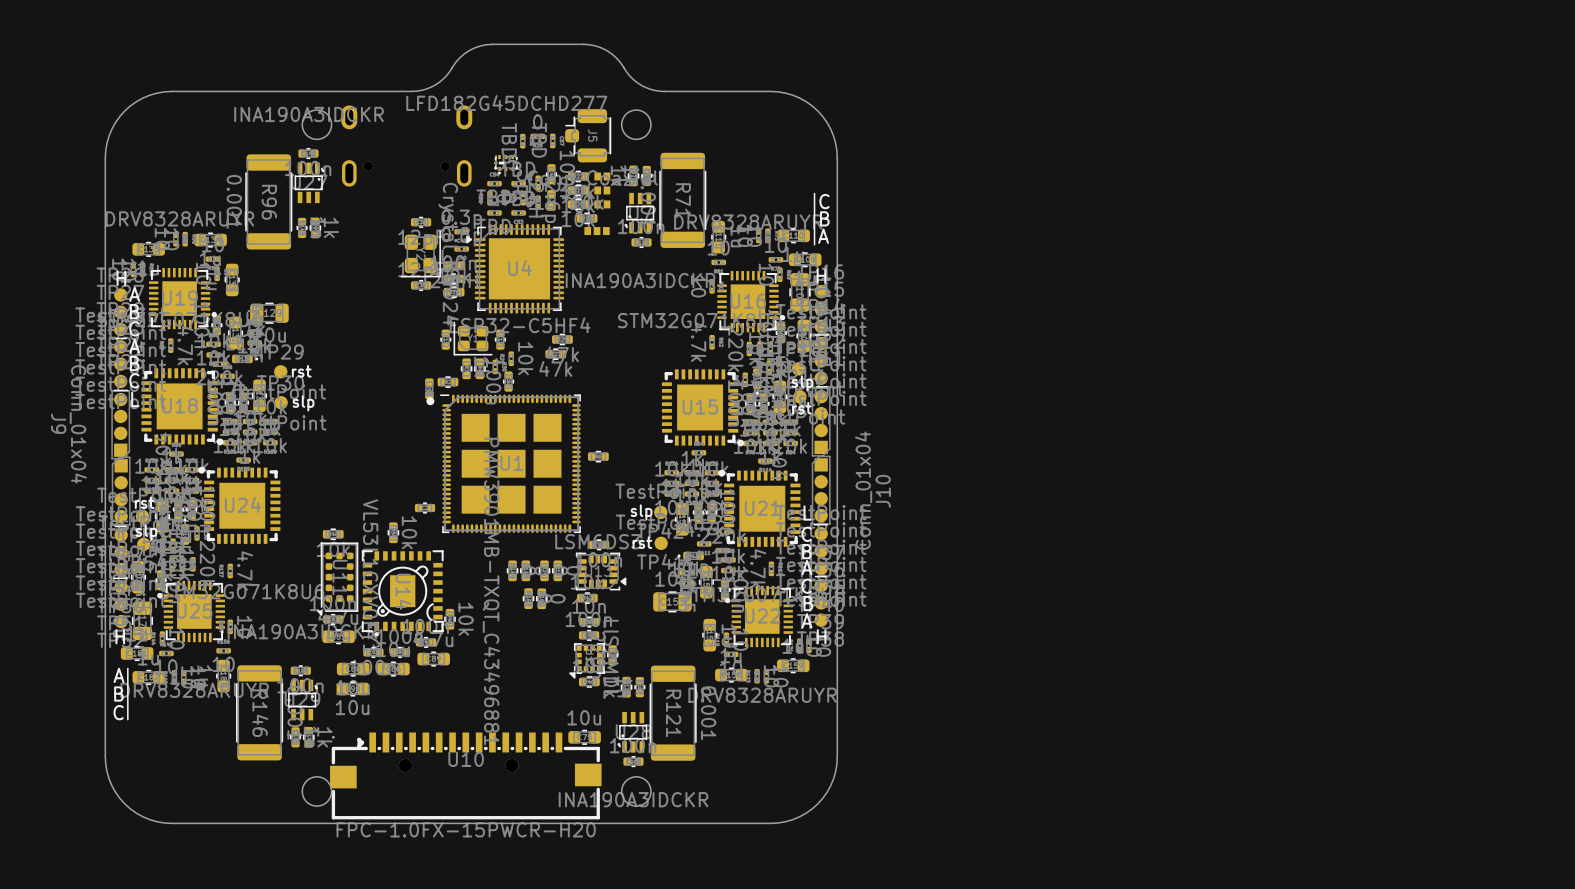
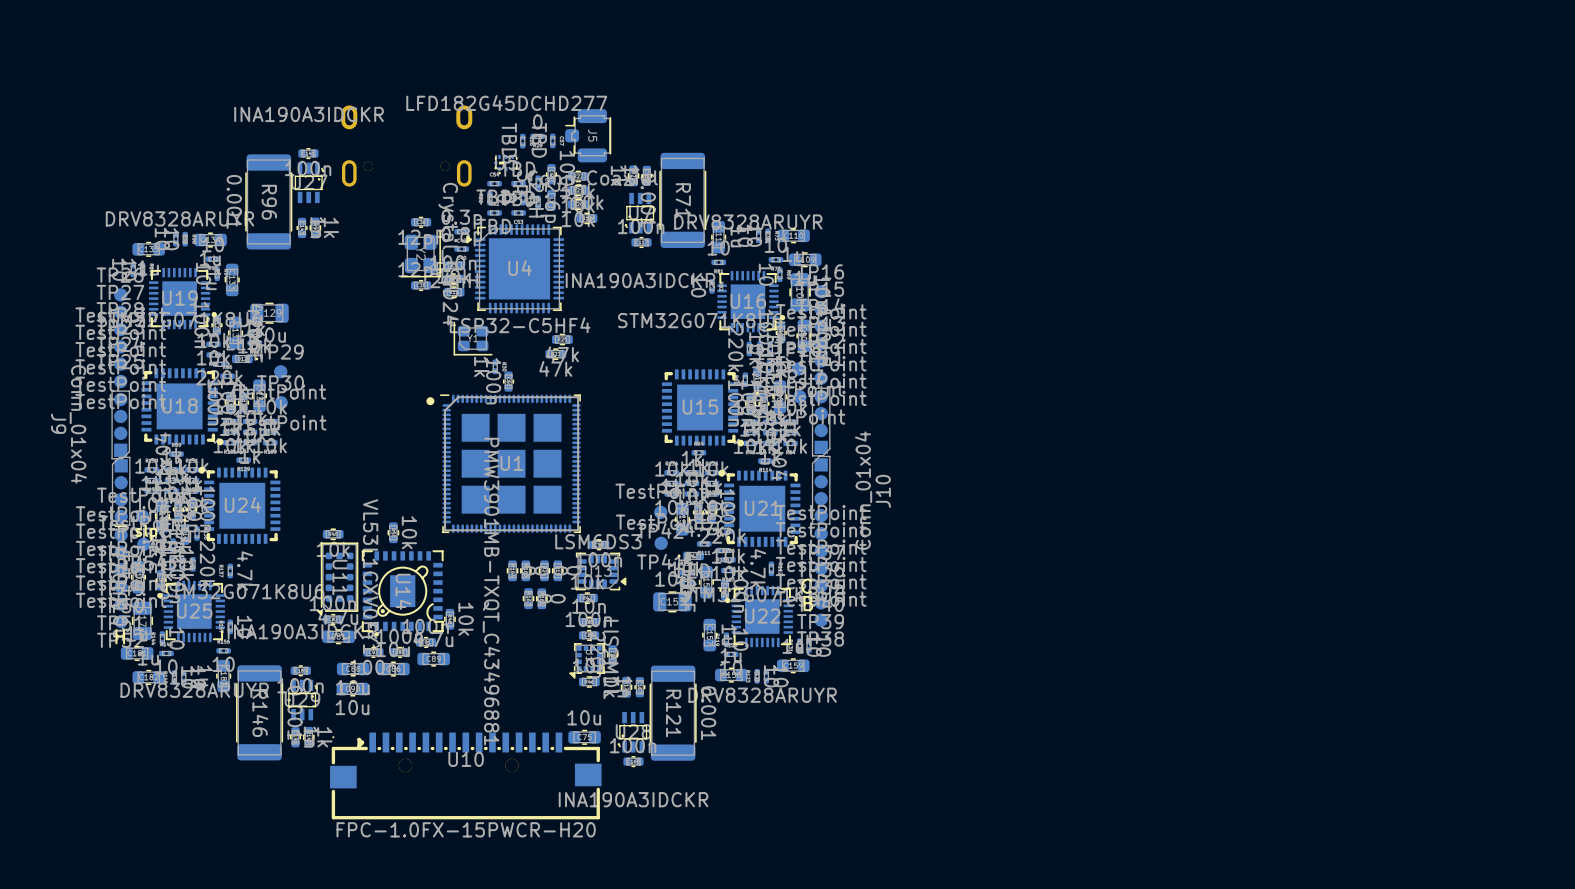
board edge: (583, 44) (480, 45) (469, 50) (459, 57) (439, 82) (430, 87) (416, 91) (164, 91) (149, 95) (136, 101) (124, 110) (115, 122) (107, 143) (105, 157) (105, 756) (107, 771) (111, 785) (119, 798) (136, 813) (157, 821) (171, 823) (770, 823) (785, 821) (806, 813) (817, 803) (827, 792) (835, 771) (837, 756) (837, 157) (833, 136) (827, 122) (817, 110) (806, 101) (792, 95) (770, 91) (654, 90) (645, 87) (632, 79) (616, 57) (606, 50) (595, 45) (583, 44) -> none
round board edge: [301, 109, 332, 140] -> none
round board edge: [621, 109, 652, 140] -> none
part: (602, 176) -> none
part: (602, 190) -> none
line: (814, 193) (814, 244) -> none
text: C (824, 201) -> none
part: (602, 204) -> none
text: B (824, 218) -> none
part: (597, 231) -> none
text: A (823, 236) -> none
text: H (821, 276) -> none
text: H (121, 278) -> none
text: A (134, 294) -> none
text: B (134, 311) -> none
text: C (134, 328) -> none
line: (828, 334) (815, 334) -> none
line: (126, 338) (115, 338) -> none
part: (445, 339) -> none
part: (500, 339) -> none
part: 4.7k (712, 342) -> none
part: 4.7k (170, 345) -> none
text: A (134, 346) -> none
part: 10k (511, 358) -> none
text: B (134, 363) -> none
part: (466, 368) -> none
part: (479, 368) -> none
text: rst (301, 371) -> none
text: C (134, 380) -> none
part: (447, 382) -> none
text: slp (802, 383) -> none
line: (827, 386) (816, 386) -> none
line: (127, 390) (114, 390) -> none
part: (429, 391) -> none
text: L (135, 399) -> none
text: slp (303, 403) -> none
text: rst (801, 408) -> none
part: (598, 456) -> none
text: rst (144, 502) -> none
part: (425, 508) -> none
text: slp (641, 512) -> none
text: L (807, 513) -> none
line: (827, 524) (814, 524) -> none
text: C (806, 534) -> none
text: rst (642, 542) -> none
text: B (806, 551) -> none
text: A (807, 567) -> none
line: (826, 576) (815, 576) -> none
line: (127, 578) (113, 578) -> none
text: A (807, 620) -> none
text: H (821, 636) -> none
line: (127, 668) (127, 719) -> none
text: A (119, 675) -> none
text: B (118, 694) -> none
text: C (118, 712) -> none
round board edge: [301, 776, 332, 807] -> none
round board edge: [621, 776, 652, 807] -> none

